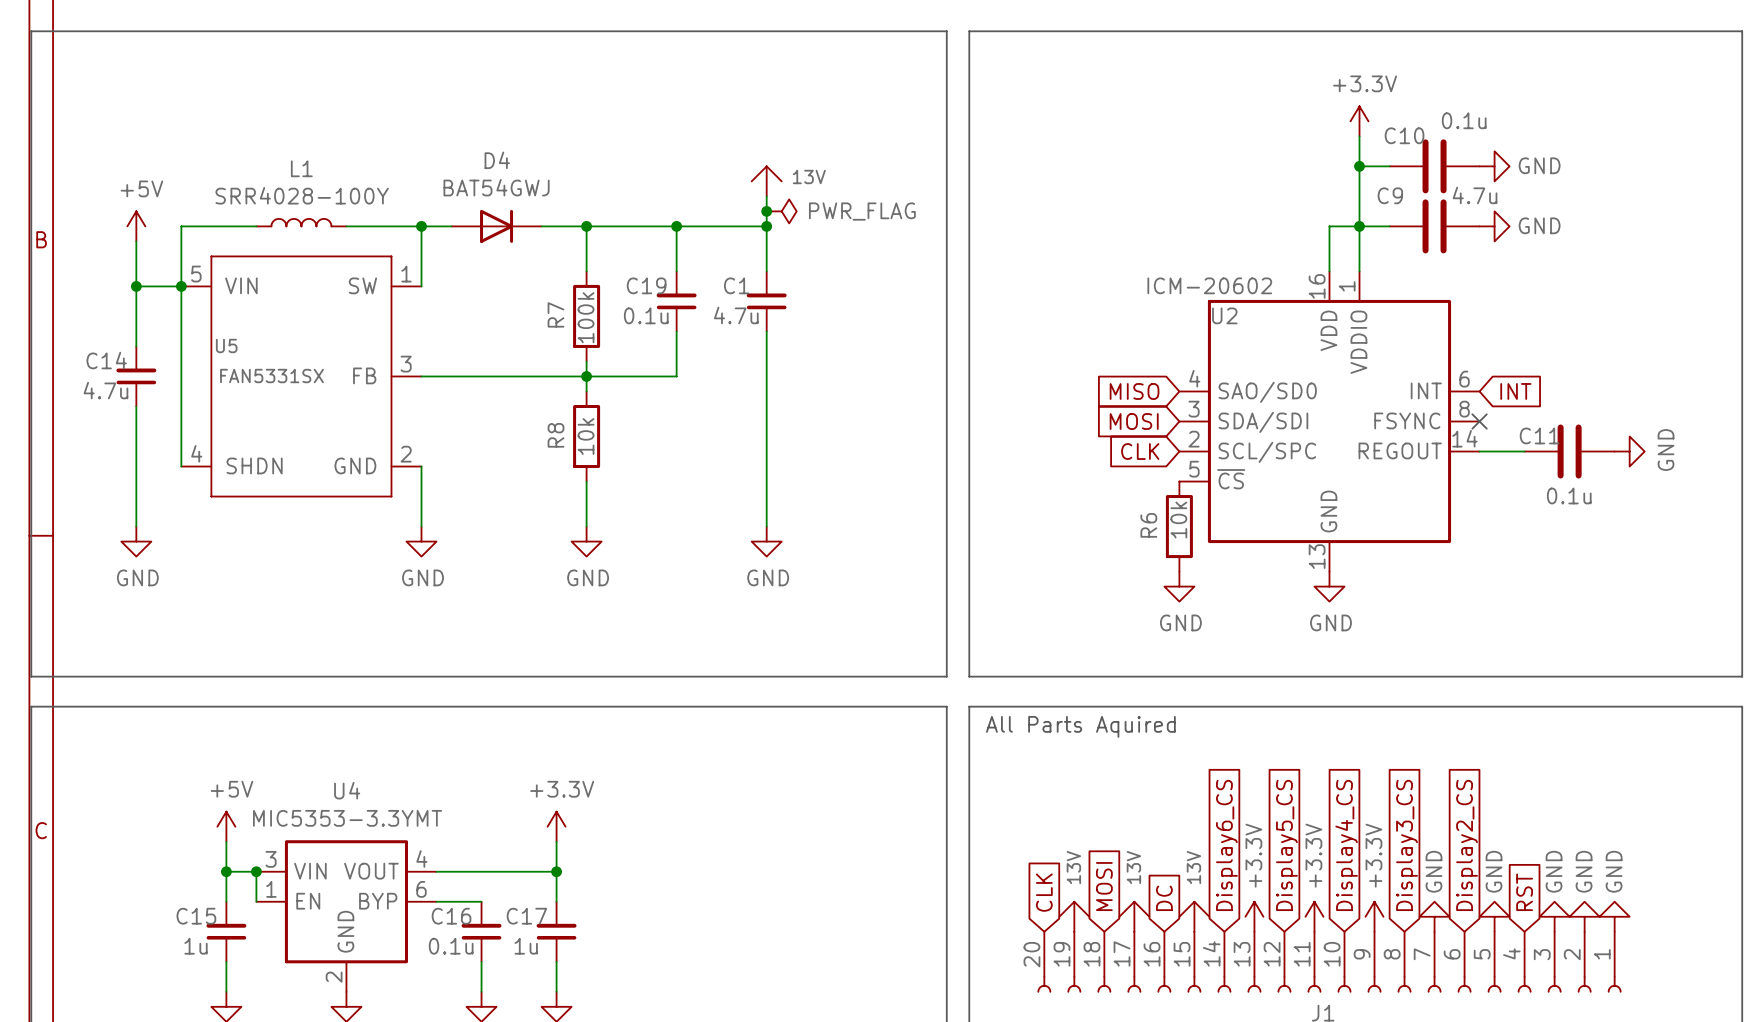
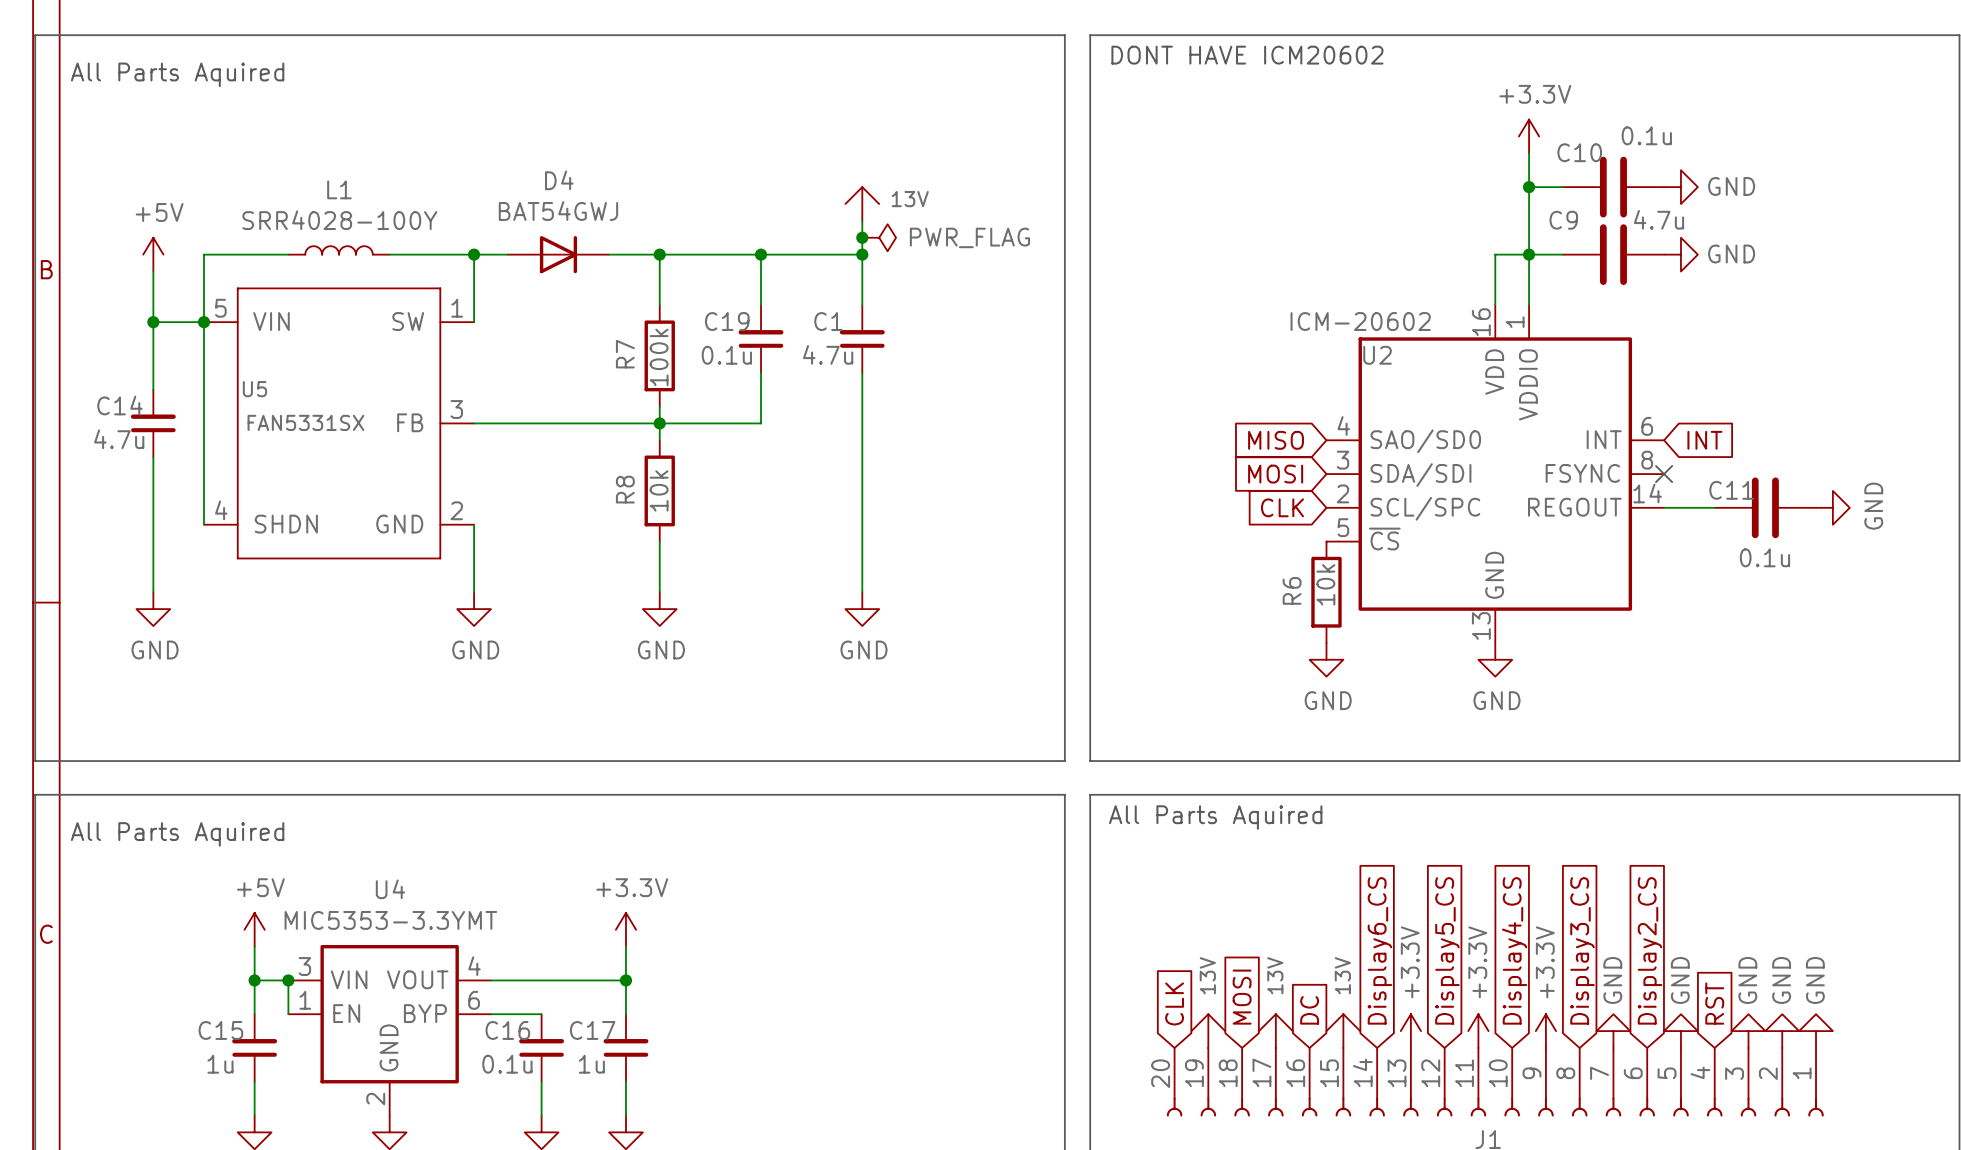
text: none -> DONT HAVE ICM20602 (1247, 55)
text: none -> All Parts Aquired (177, 74)
text: none -> All Parts Aquired (177, 834)

